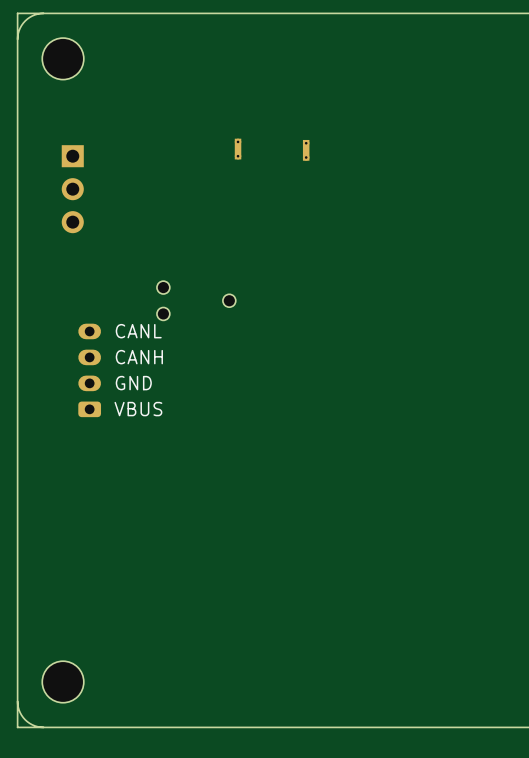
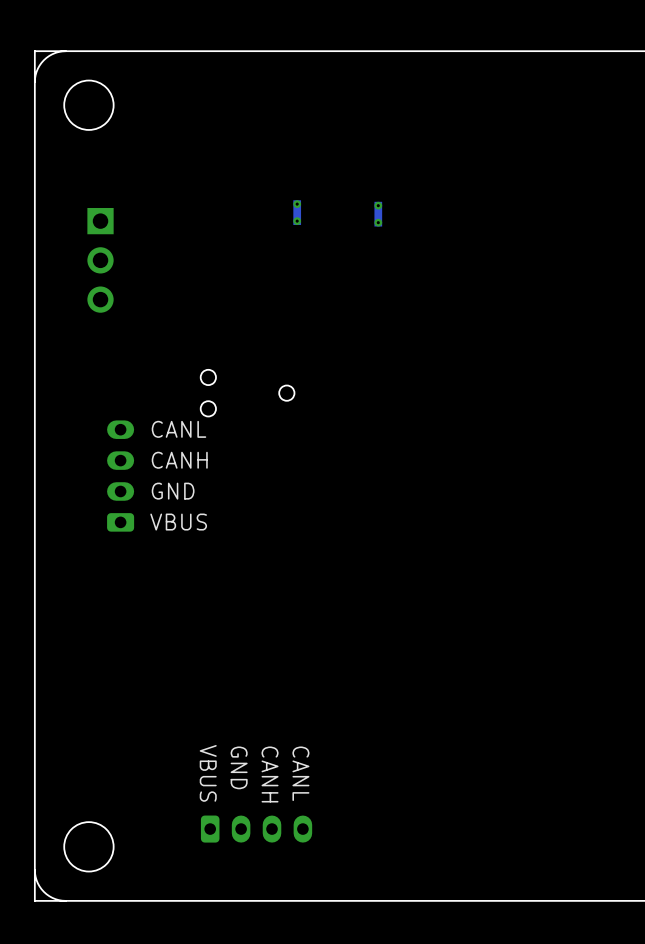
text: none -> GND (239, 767)
text: none -> VBUS (208, 773)
text: none -> CANL (300, 773)
text: none -> CANH (270, 774)
part: none -> (256, 829)

